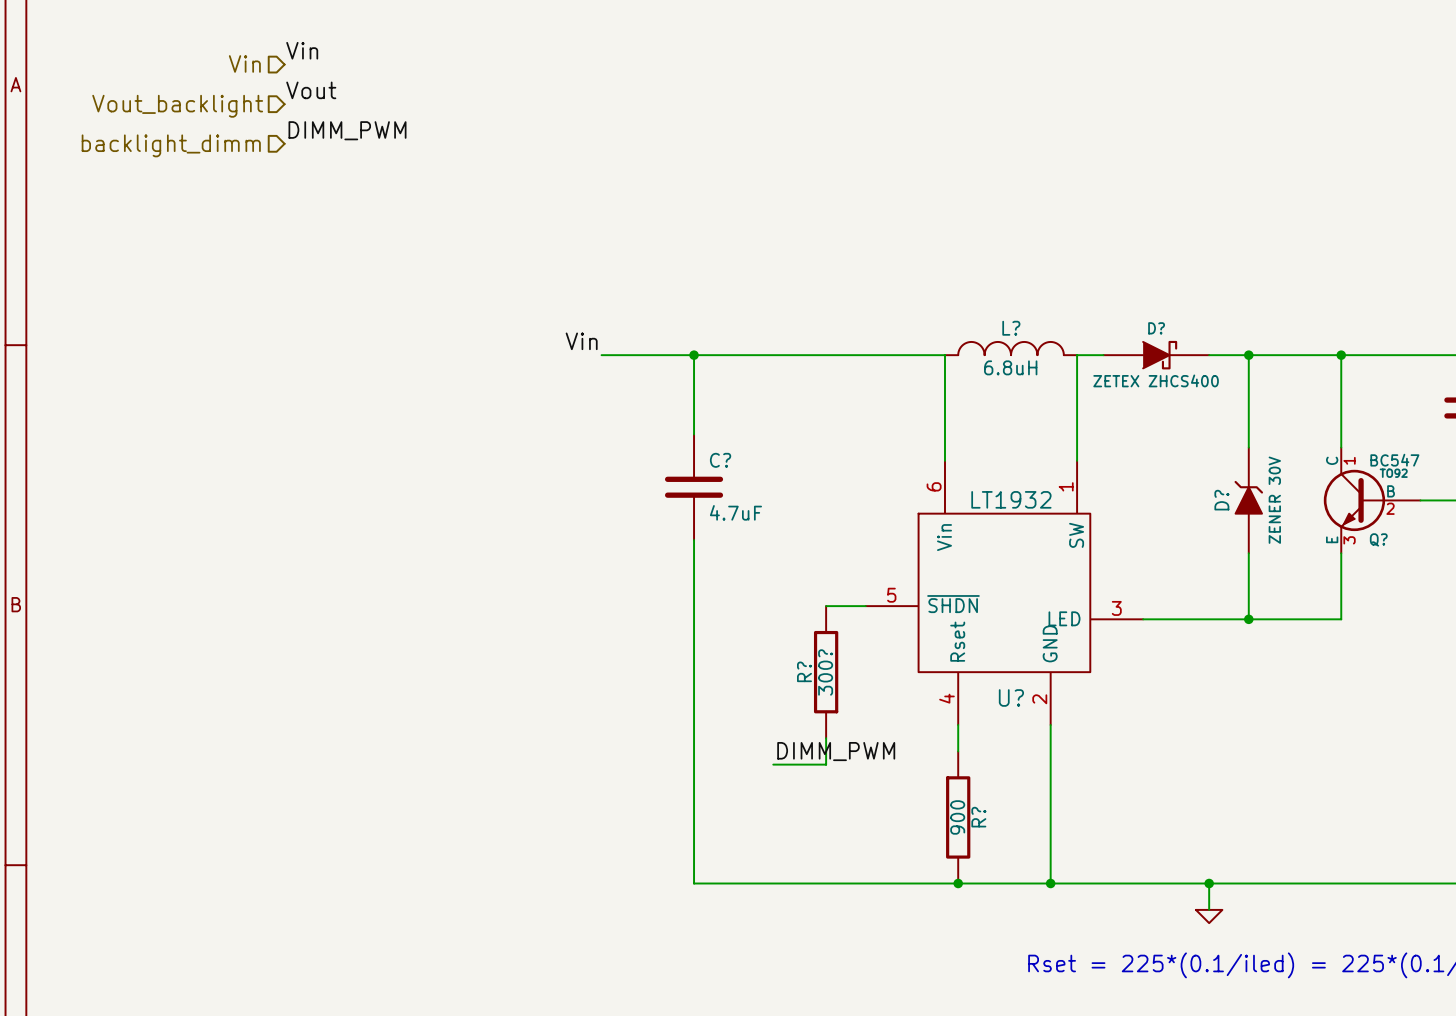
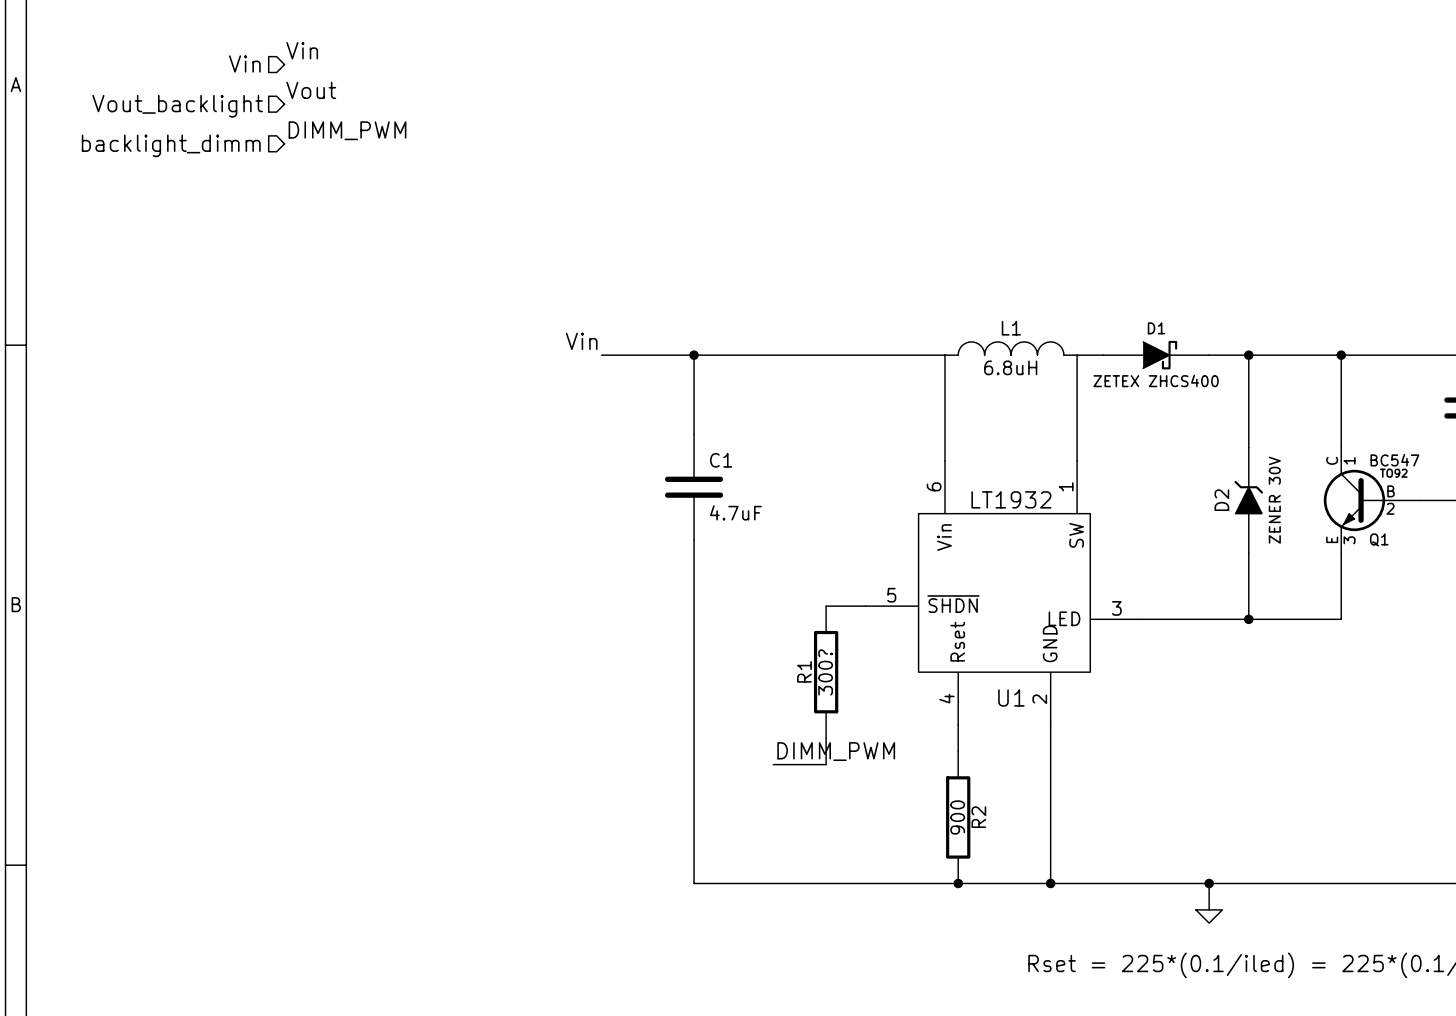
L? name: L? (1011, 328) -> L1 (1011, 328)
D? name: D? (1156, 328) -> D1 (1156, 328)
C? name: C? (720, 460) -> C1 (721, 460)
D? name: D? (1221, 500) -> D2 (1221, 500)
Q? name: Q? (1378, 539) -> Q1 (1379, 539)
R? name: R? (804, 671) -> R1 (804, 671)
U? name: U? (1011, 697) -> U1 (1011, 697)
R? name: R? (978, 817) -> R2 (978, 817)

